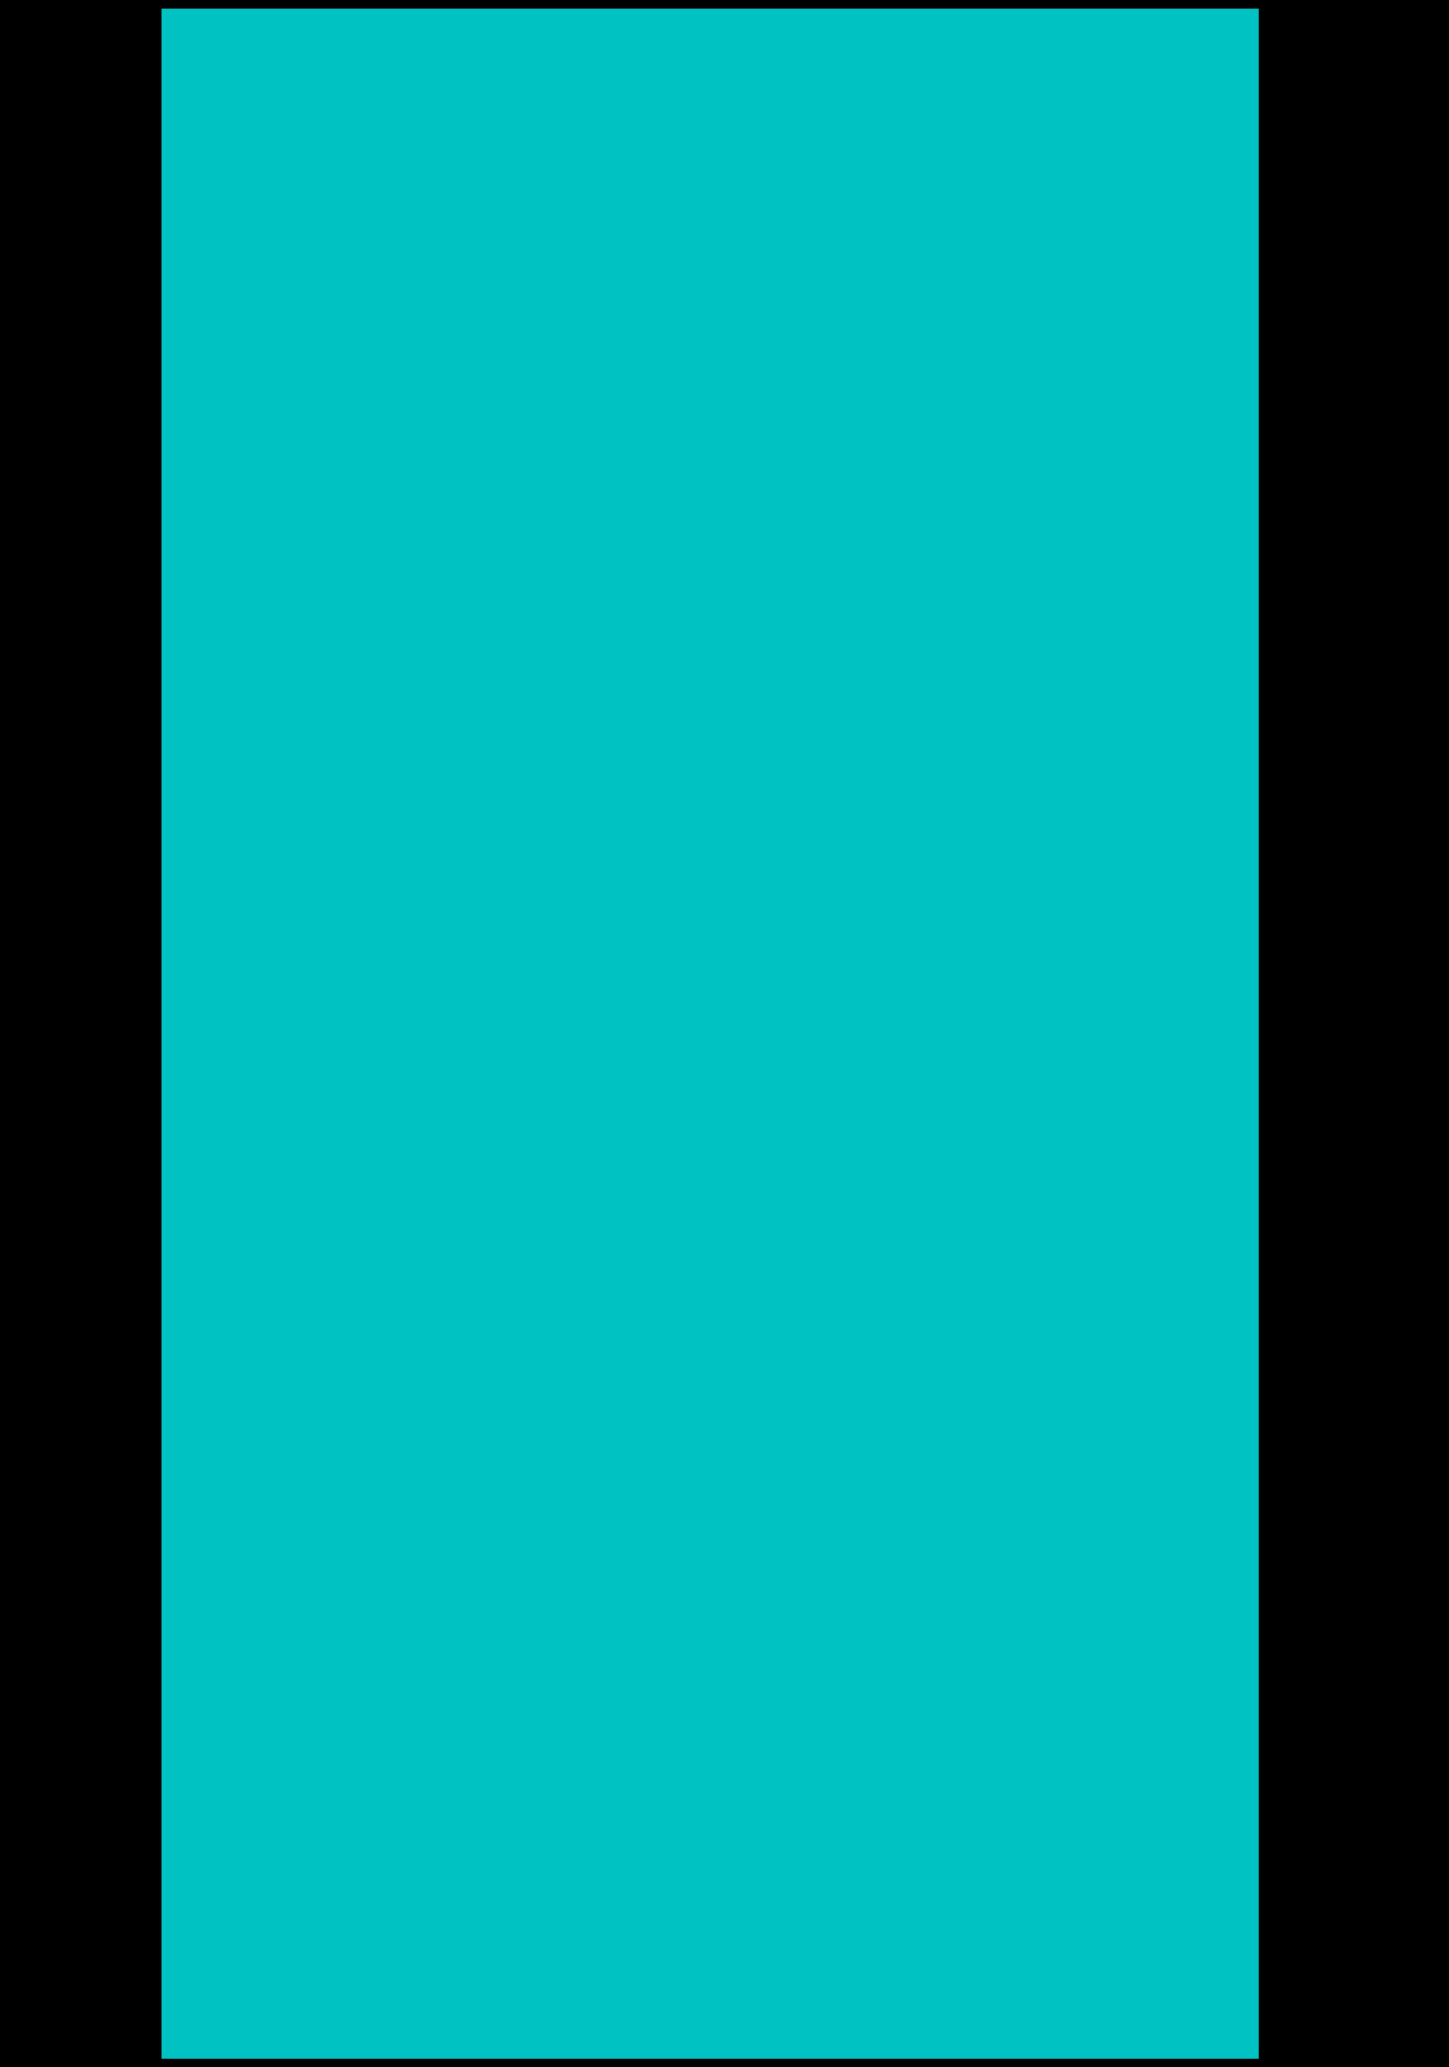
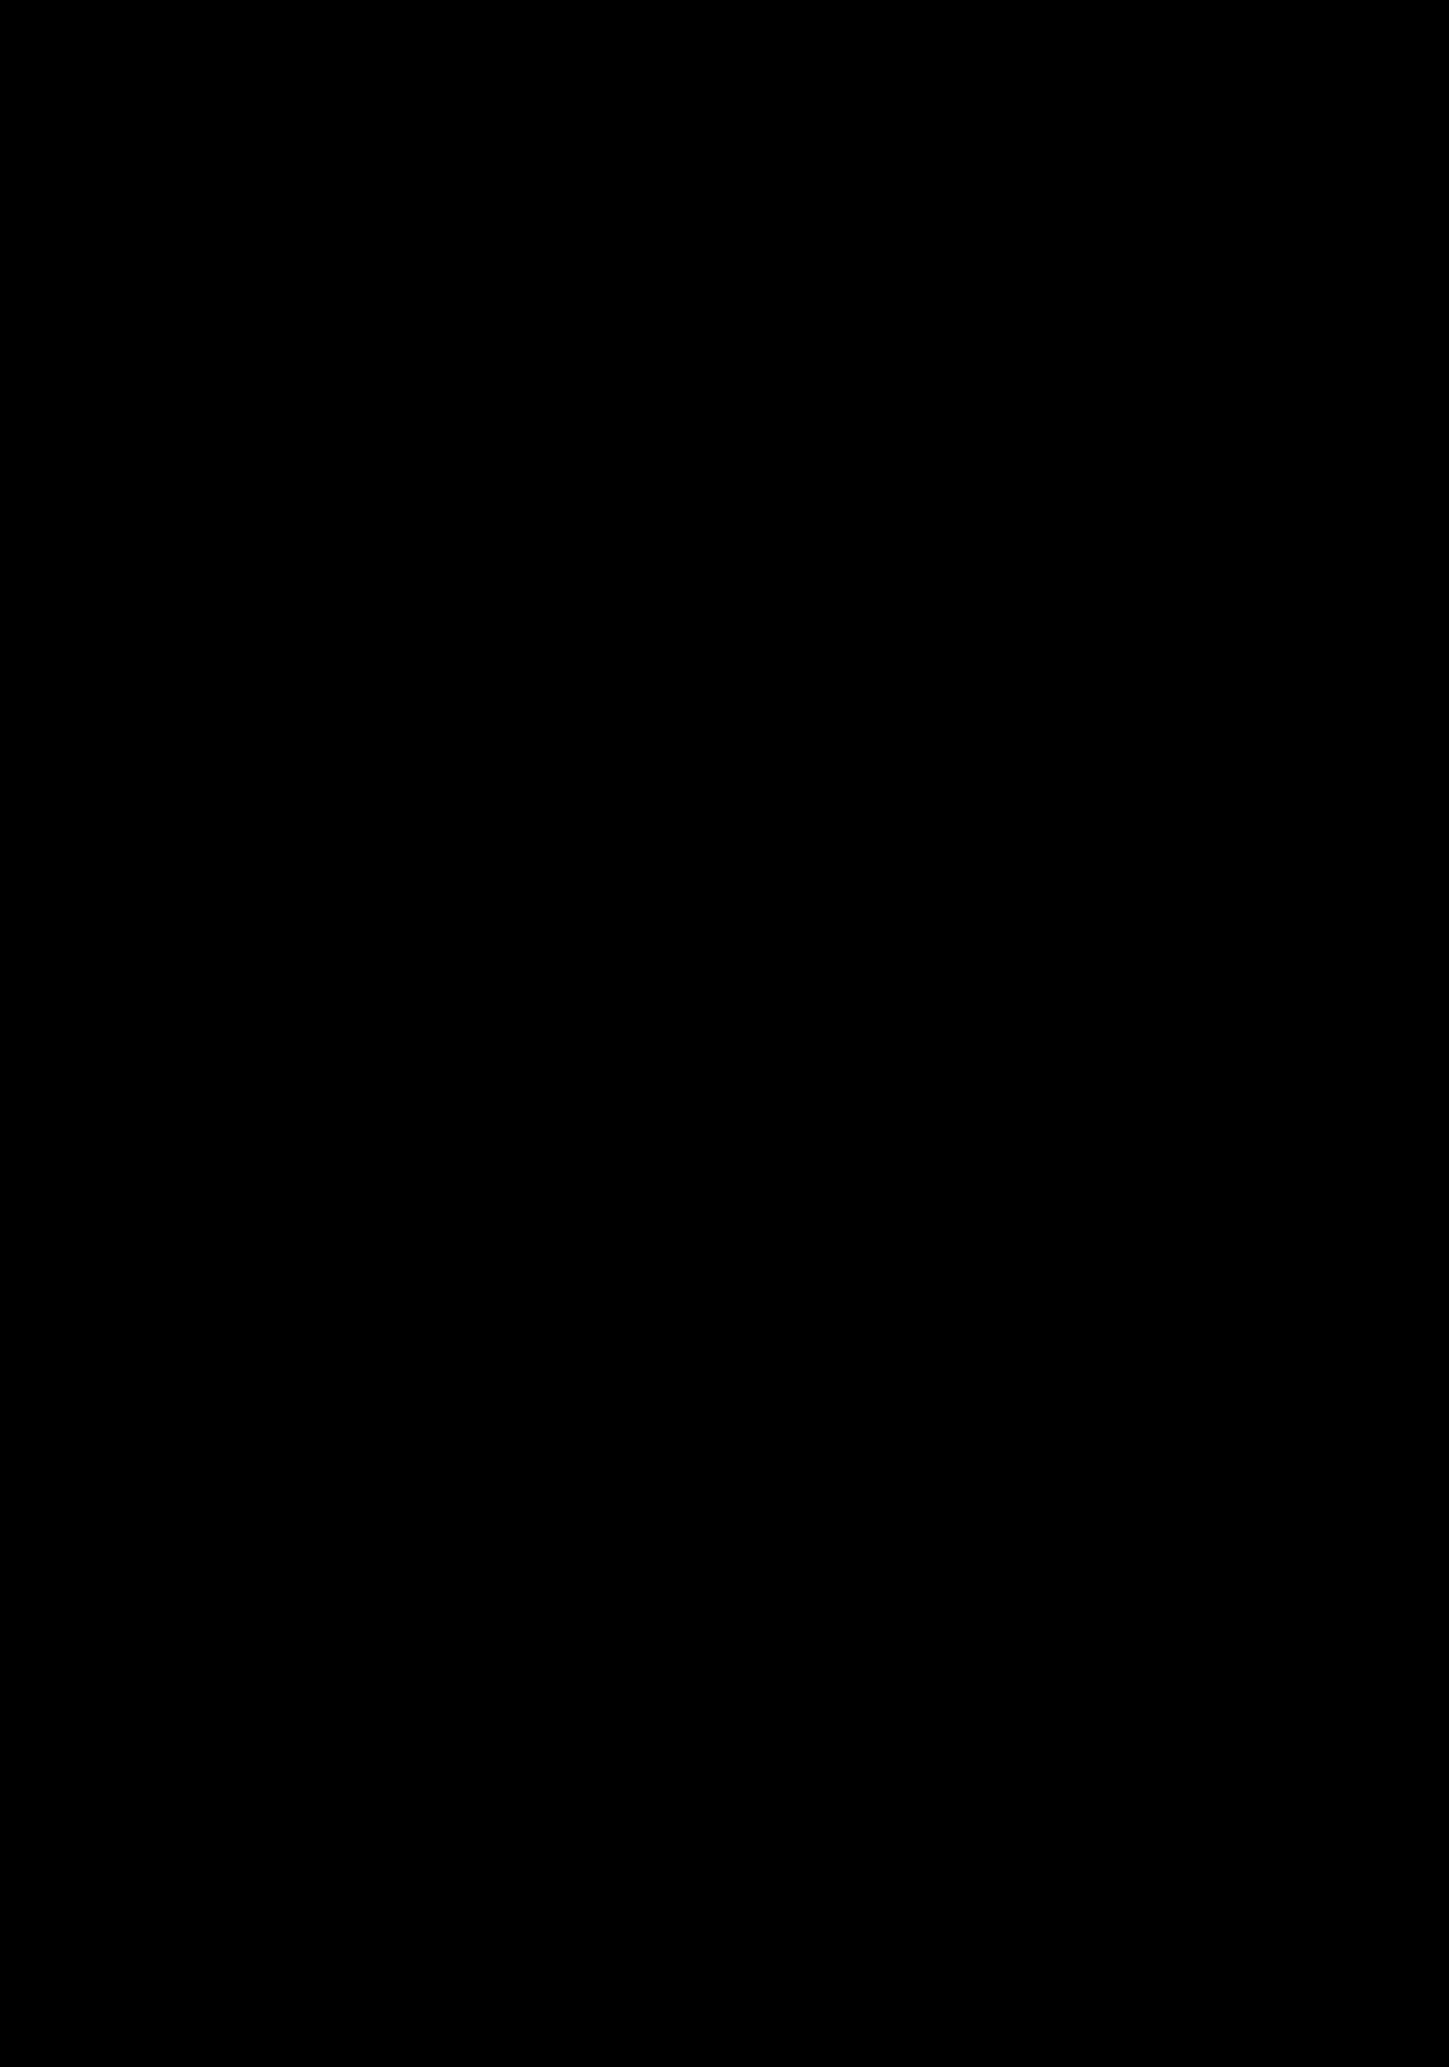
drawing: [161, 8, 1259, 2059] -> none

